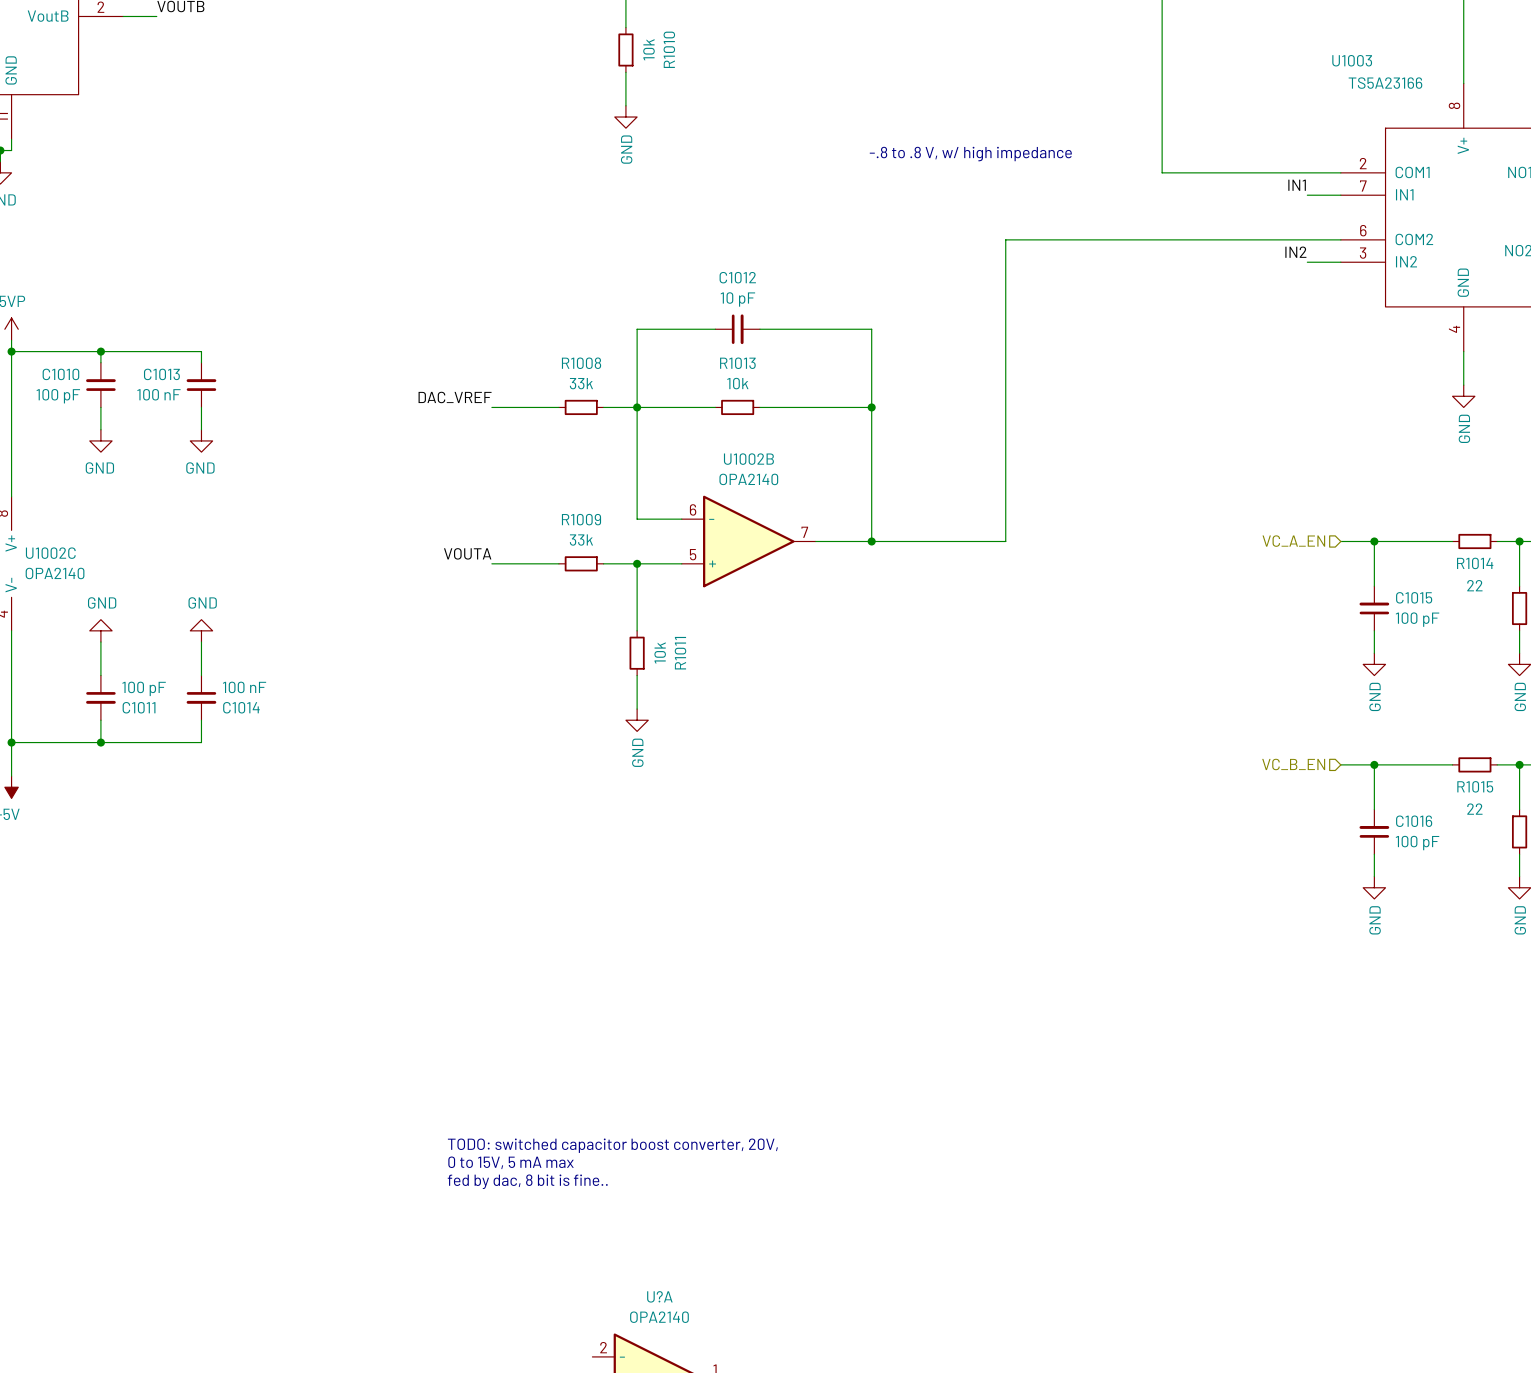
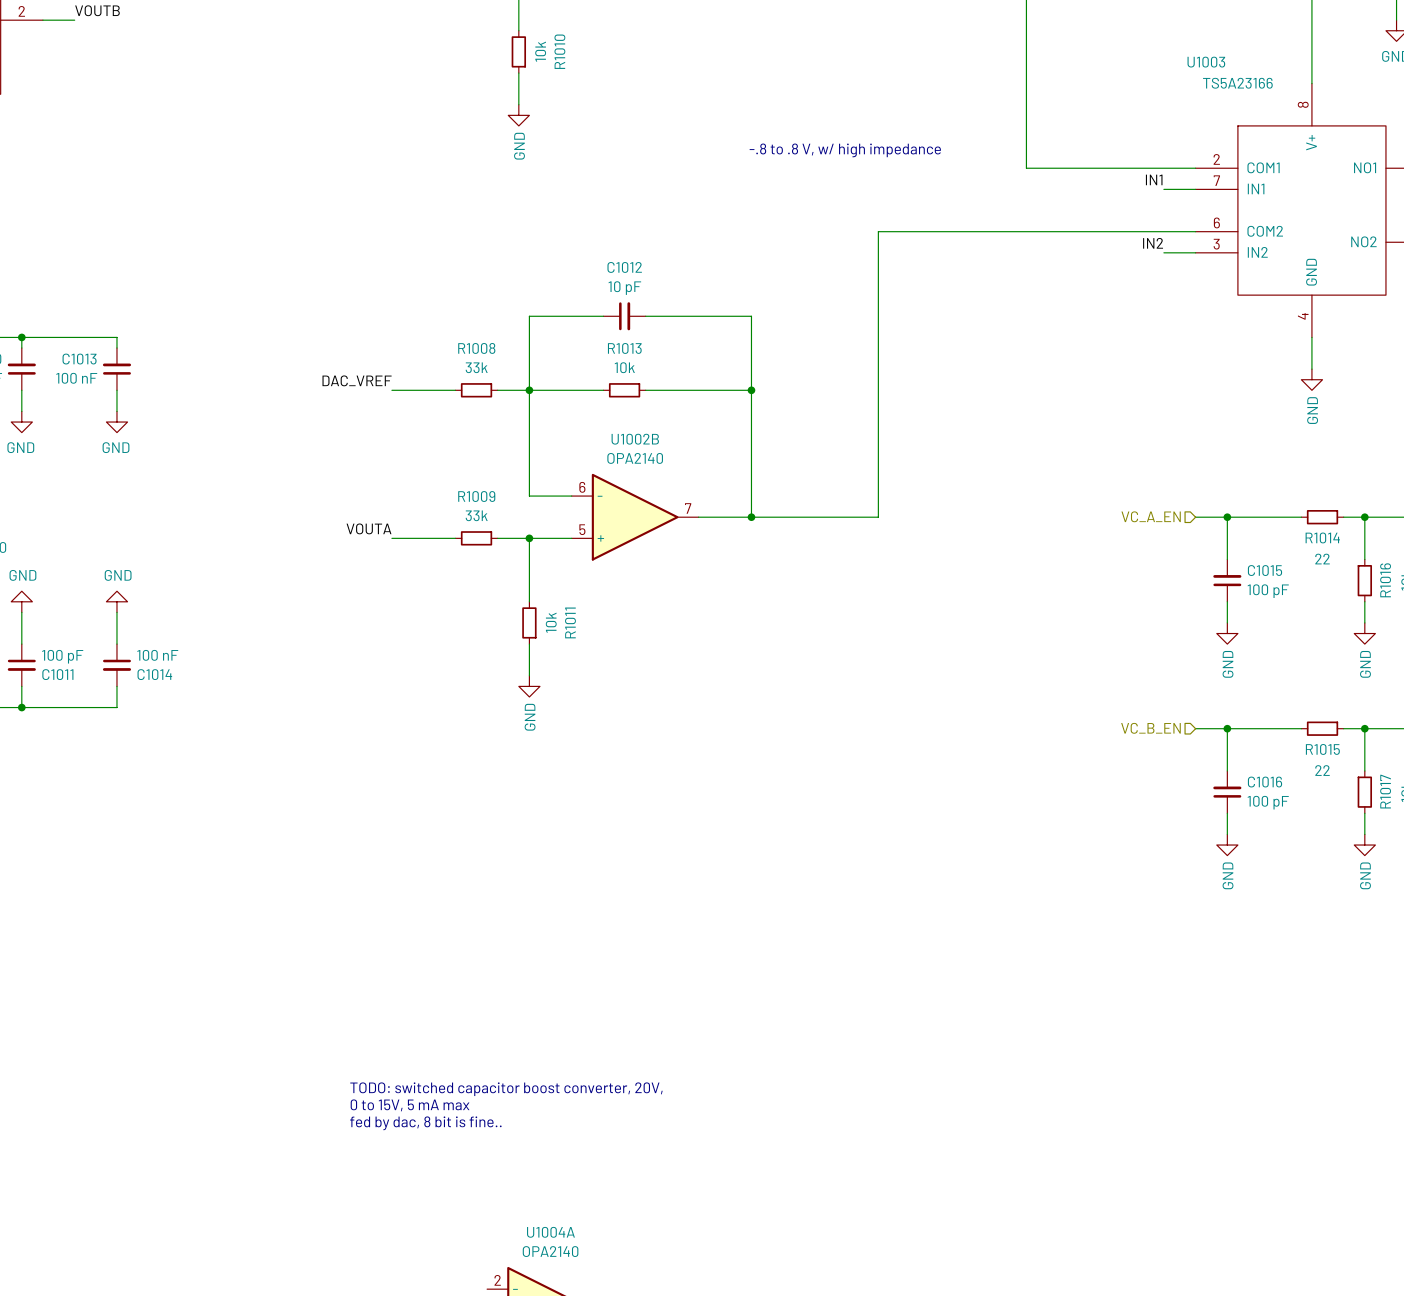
U?A name: U?A (659, 1296) -> U1004A (550, 1232)

